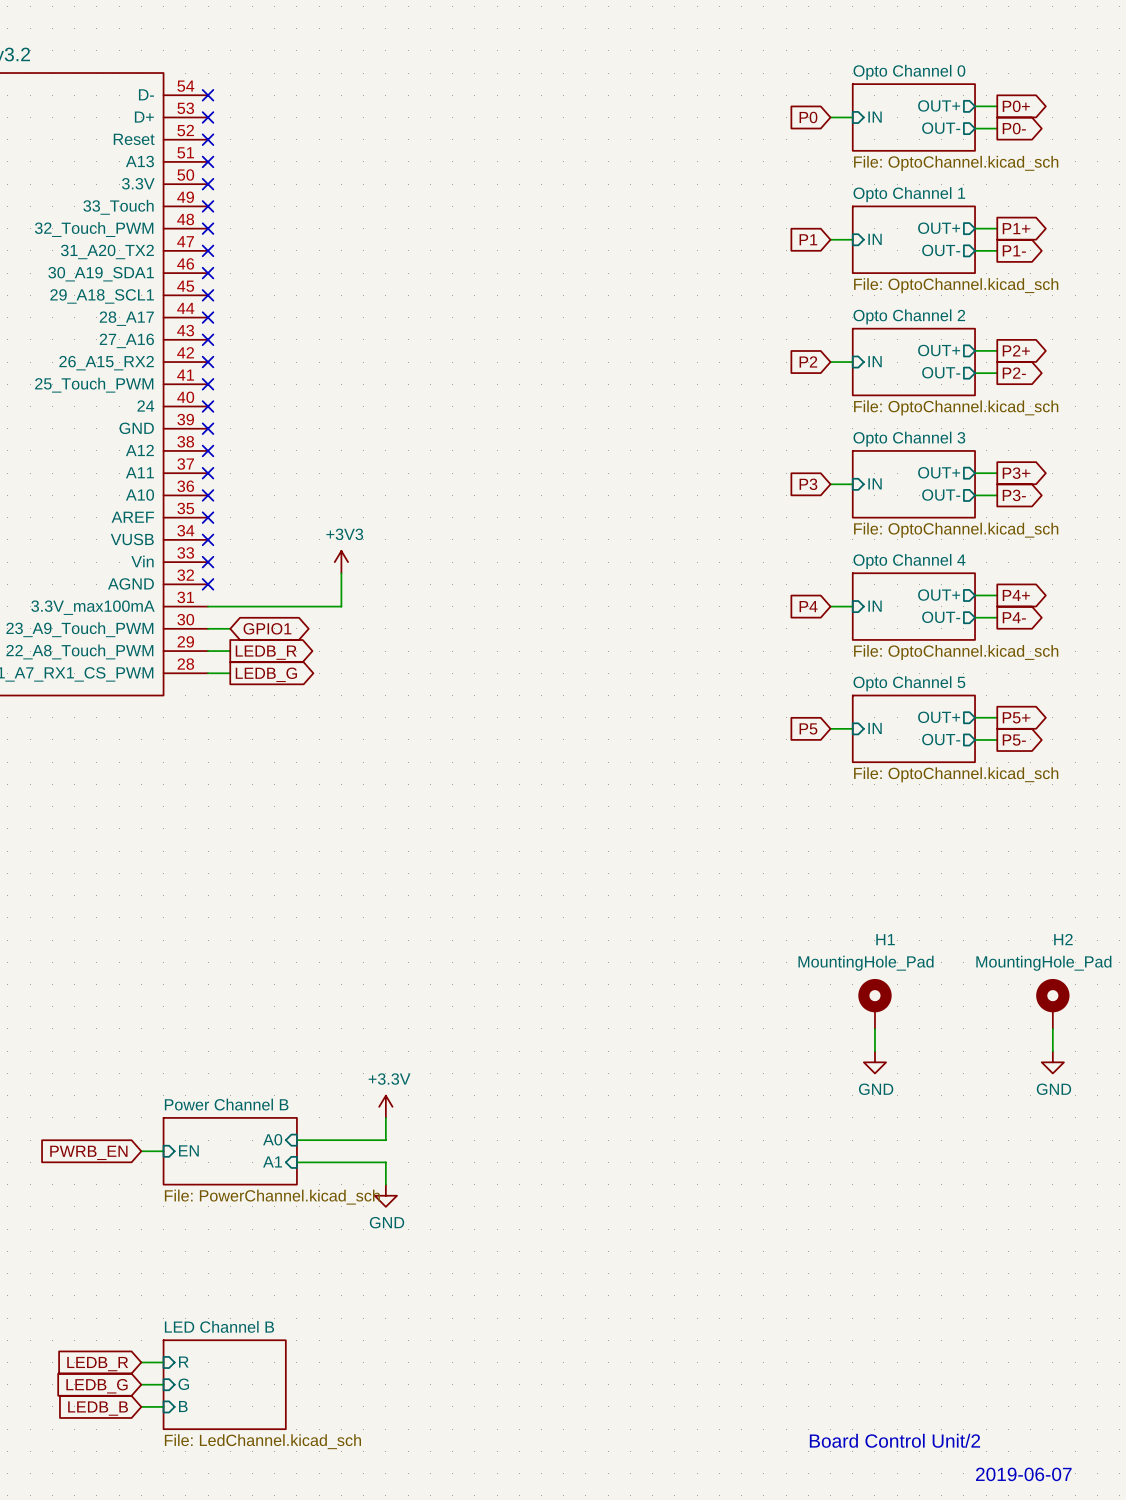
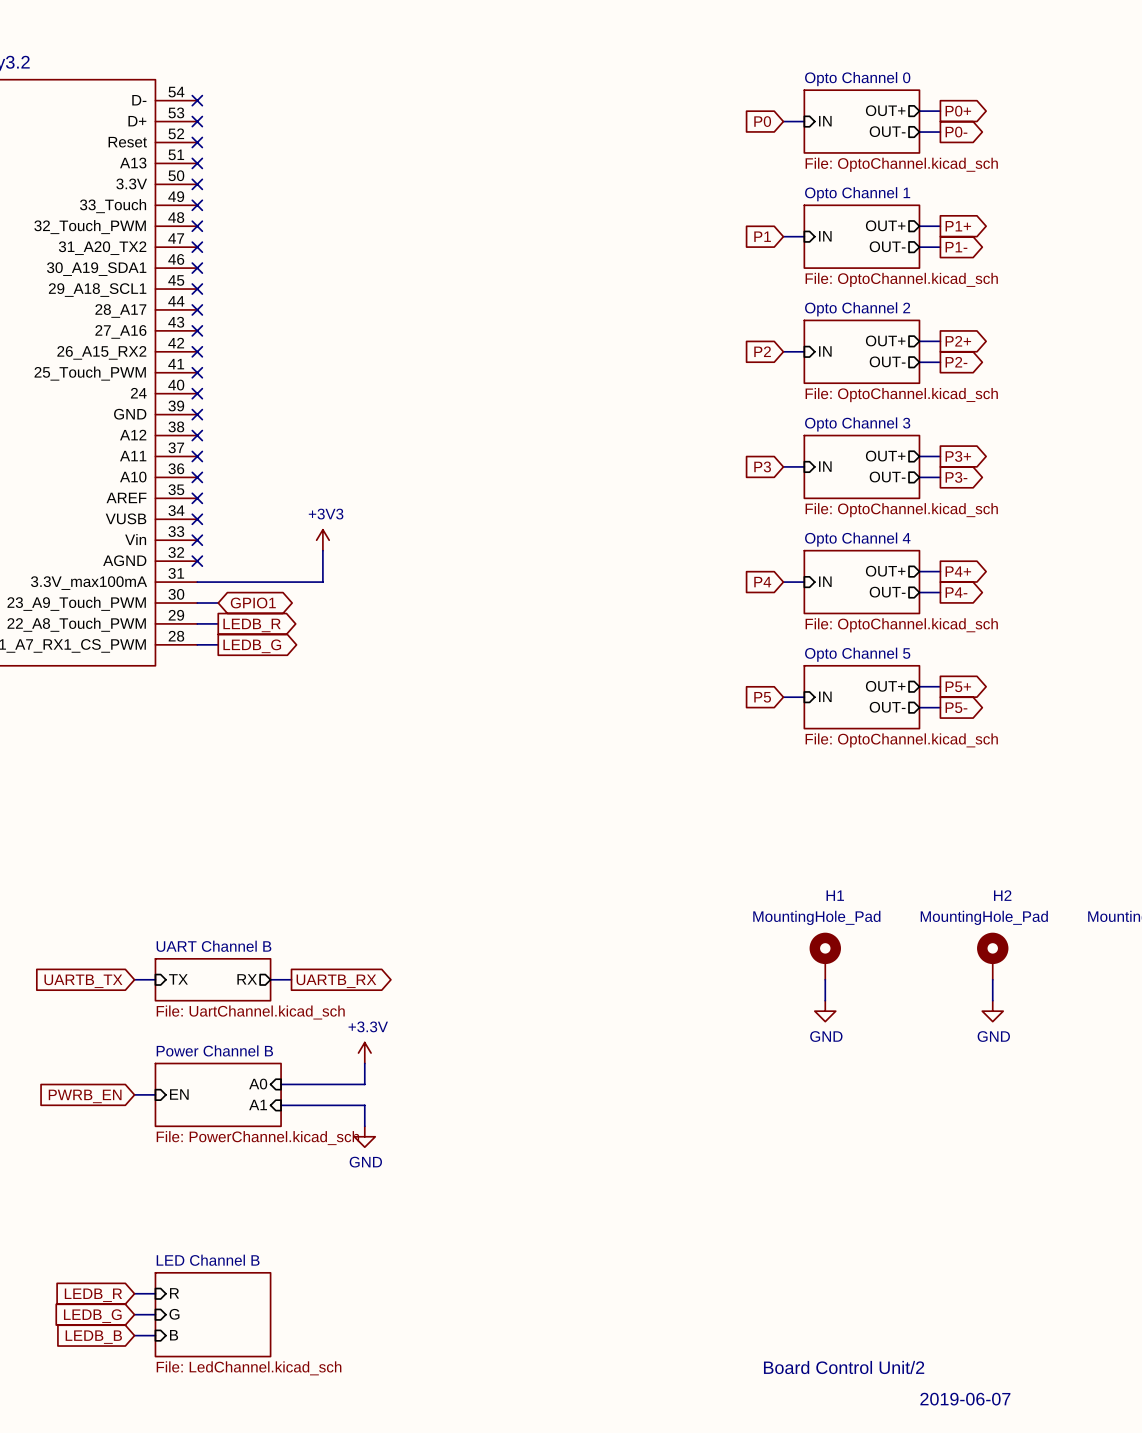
wire: none -> (134, 979) (155, 979)
sheet pin: none -> TX (178, 979)
sheet UART Channel B: none -> File: UartChannel.kicad_sch (213, 979)
sheet pin: none -> RX (247, 979)
wire: none -> (270, 979) (291, 979)
global label: none -> UARTB_TX (83, 981)
global label: none -> UARTB_RX (336, 981)

